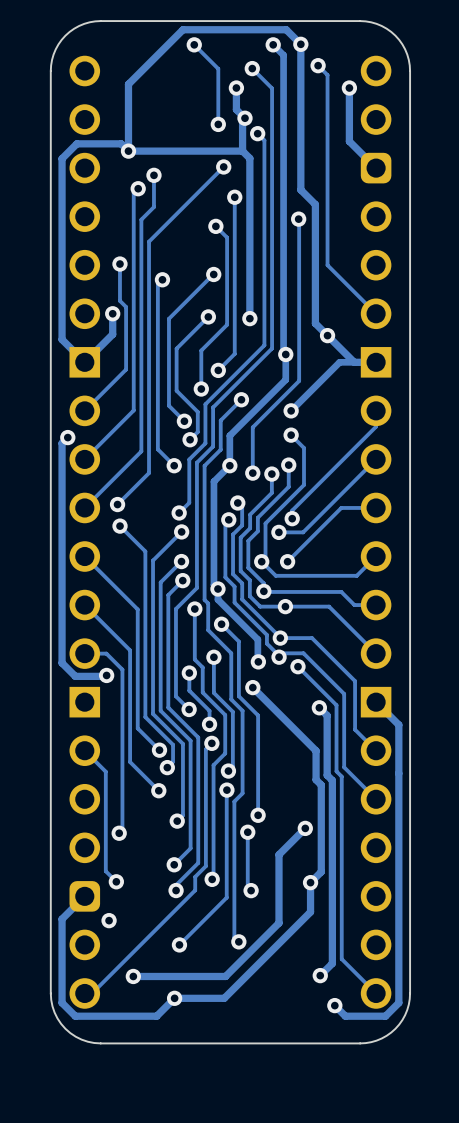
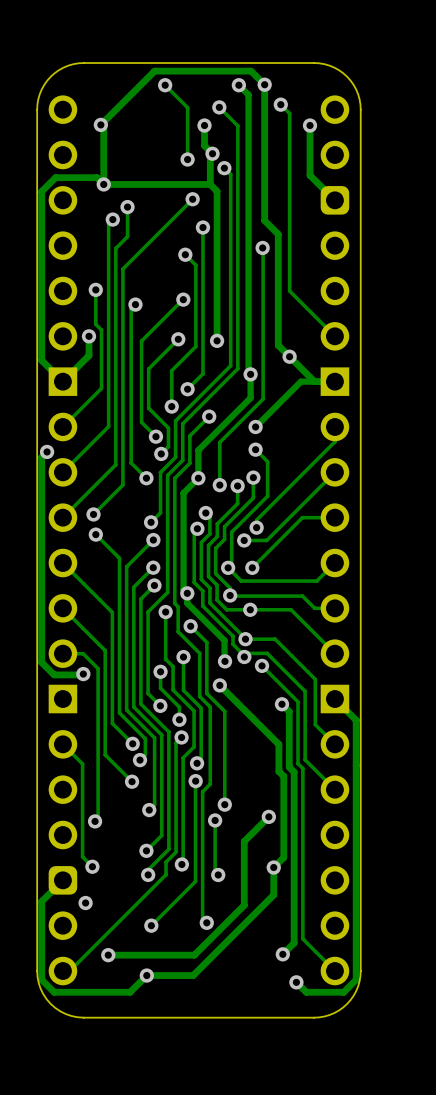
part footprint: [49, 20, 412, 1045] -> [36, 62, 362, 1019]
via: none -> (100, 124)

